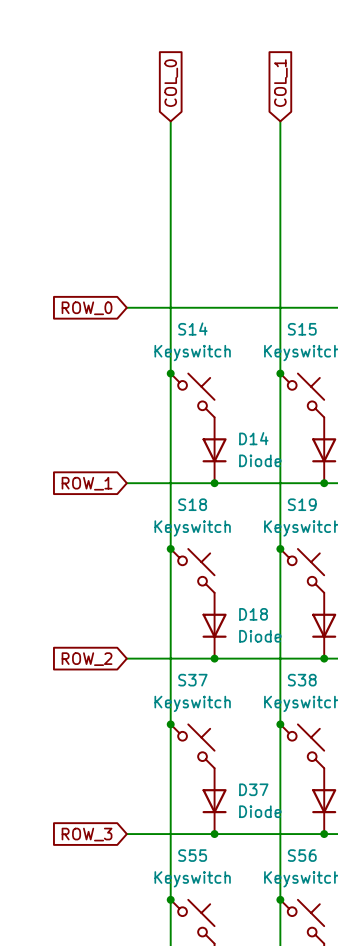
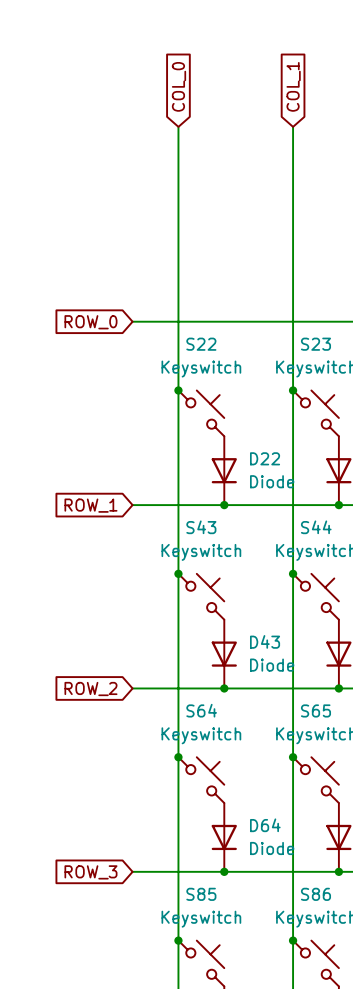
S14 name: S14 (192, 329) -> S22 (201, 344)
S15 name: S15 (302, 329) -> S23 (315, 344)
D14 name: D14 (253, 438) -> D22 (265, 458)
S18 name: S18 (192, 504) -> S43 (201, 527)
S19 name: S19 (302, 504) -> S44 (316, 527)
D18 name: D18 (253, 614) -> D43 (265, 641)
S37 name: S37 (192, 680) -> S64 (201, 710)
S38 name: S38 (302, 680) -> S65 (315, 710)
D37 name: D37 (253, 789) -> D64 (265, 825)
S55 name: S55 (192, 855) -> S85 (201, 894)
S56 name: S56 (302, 855) -> S86 (315, 894)

